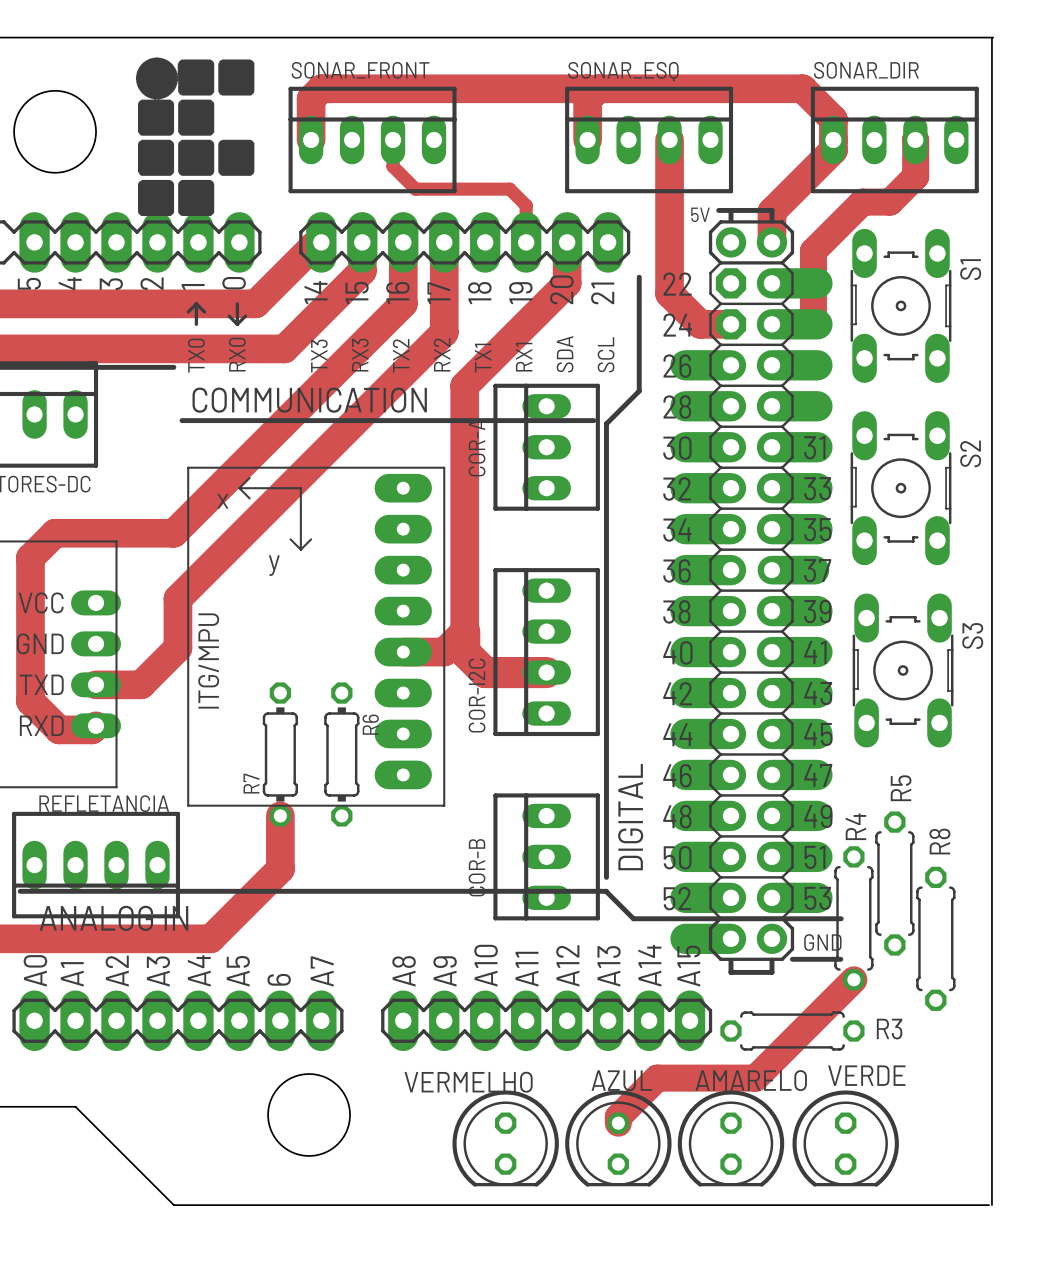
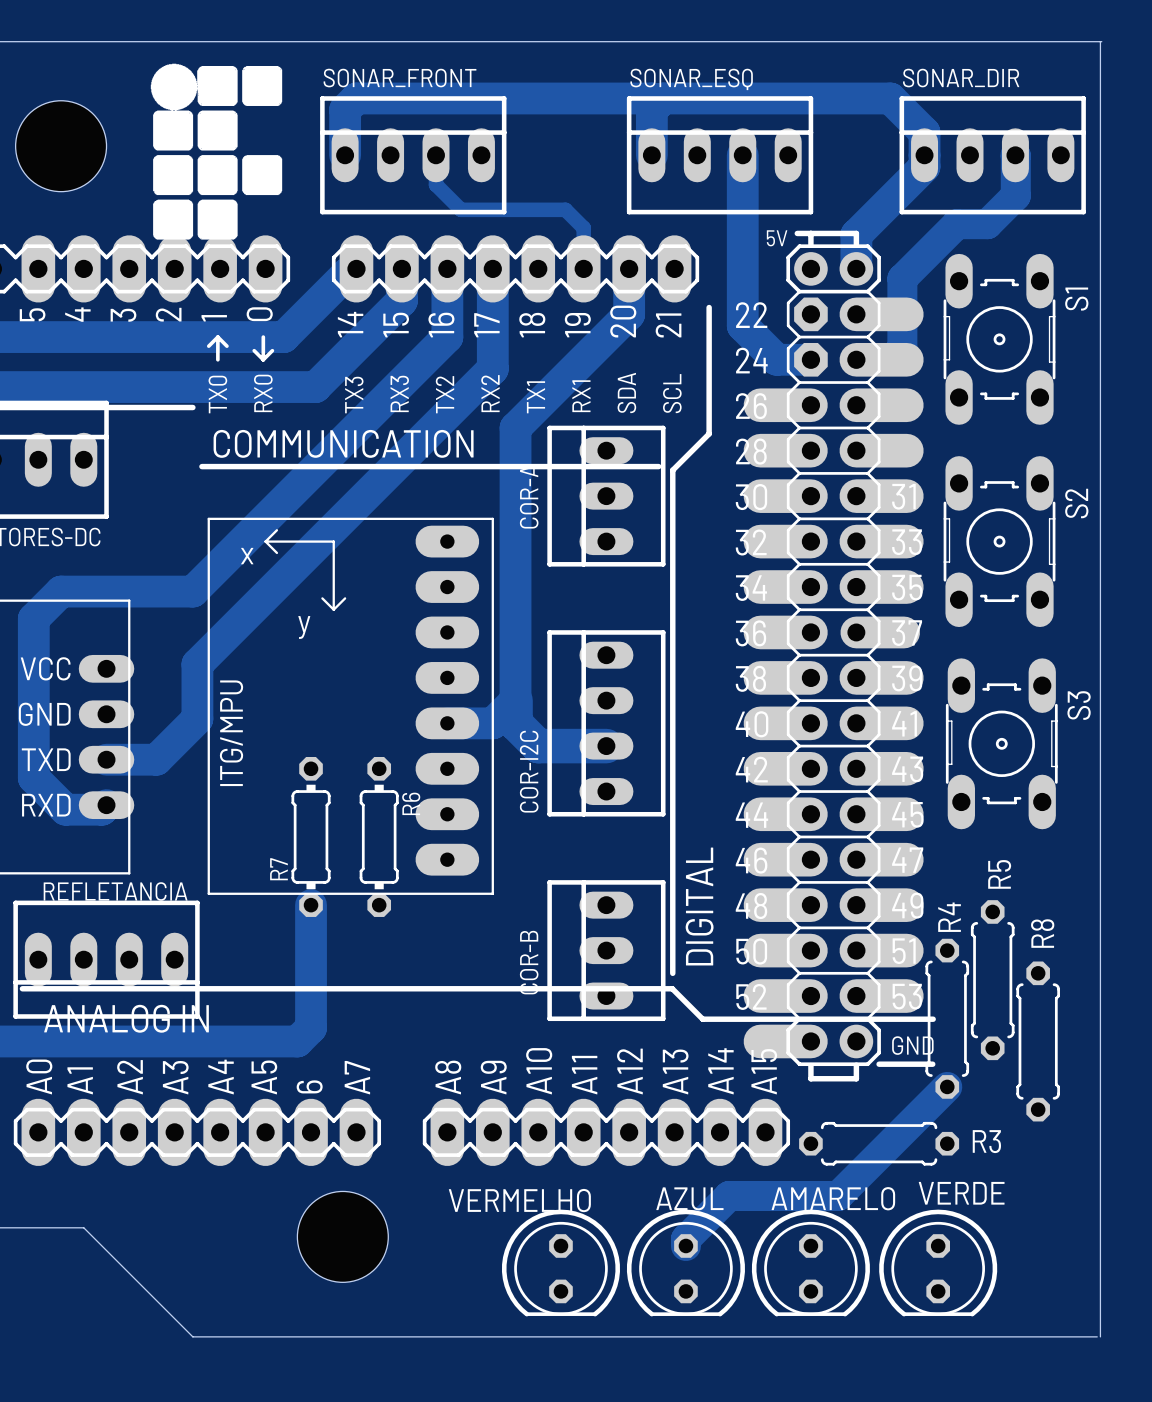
track: (280, 869) (210, 938) -> (311, 964) (311, 1027) (297, 1041) (233, 1041)

